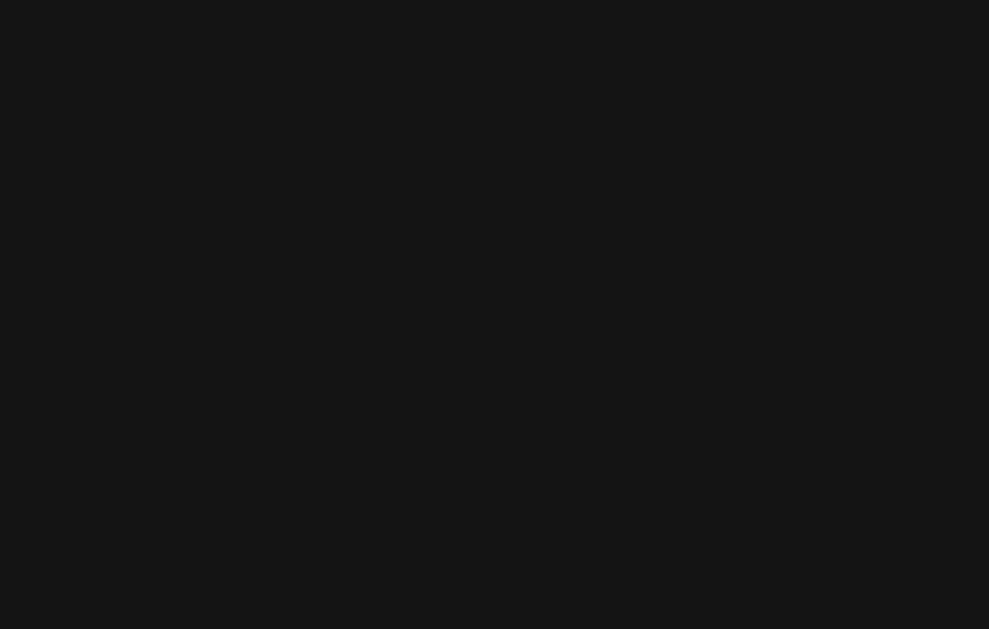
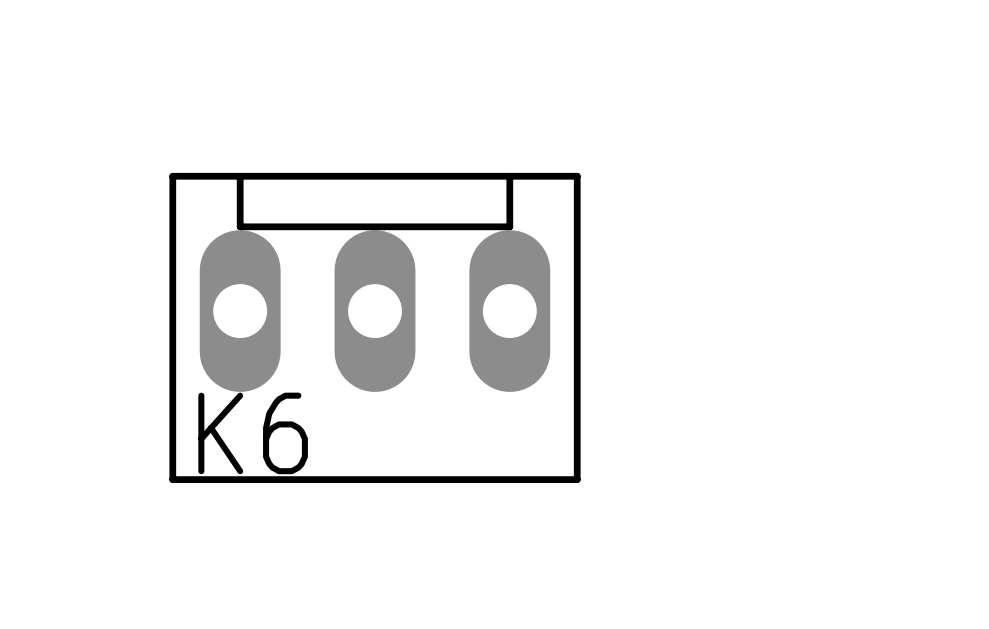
K6: none -> (375, 327)

